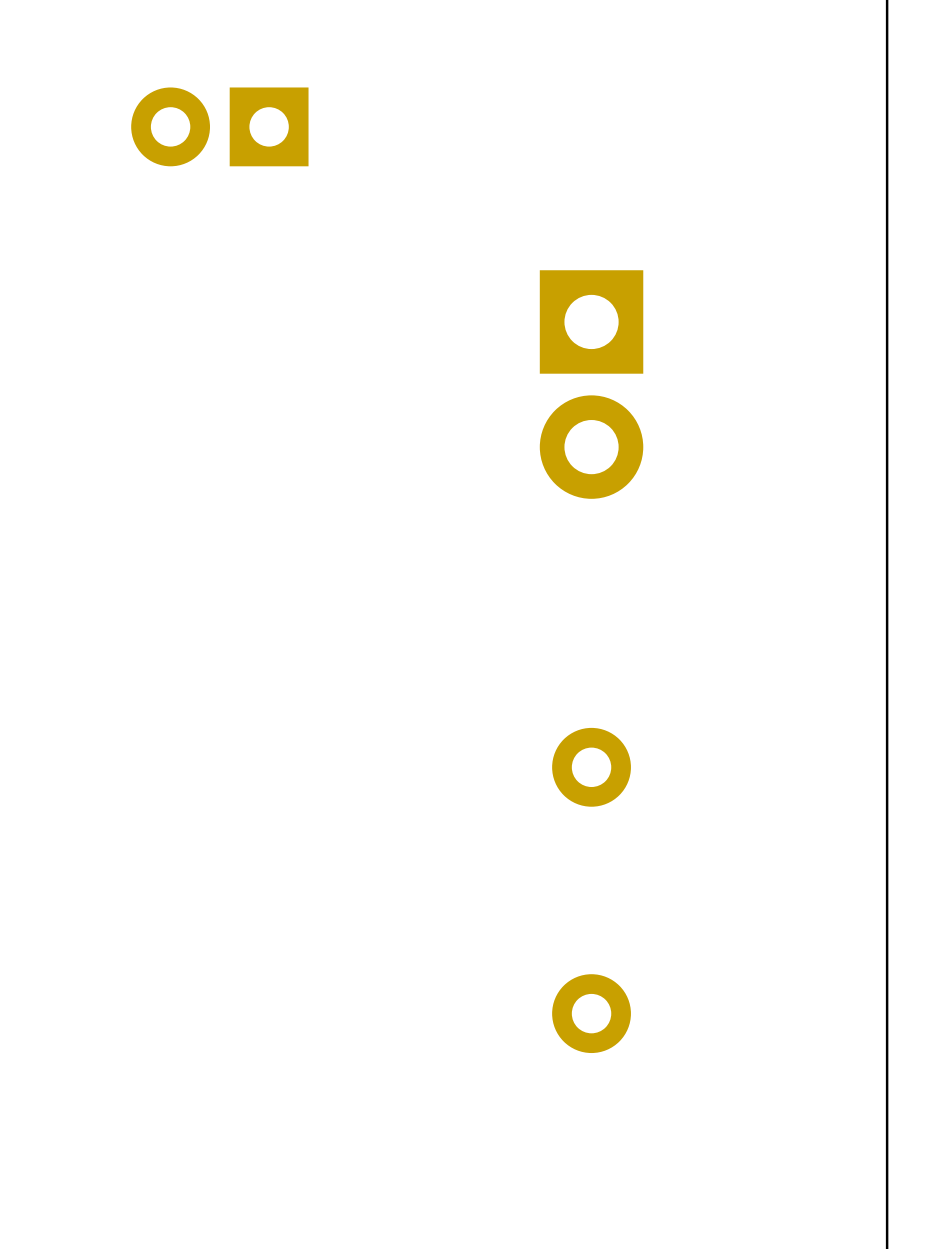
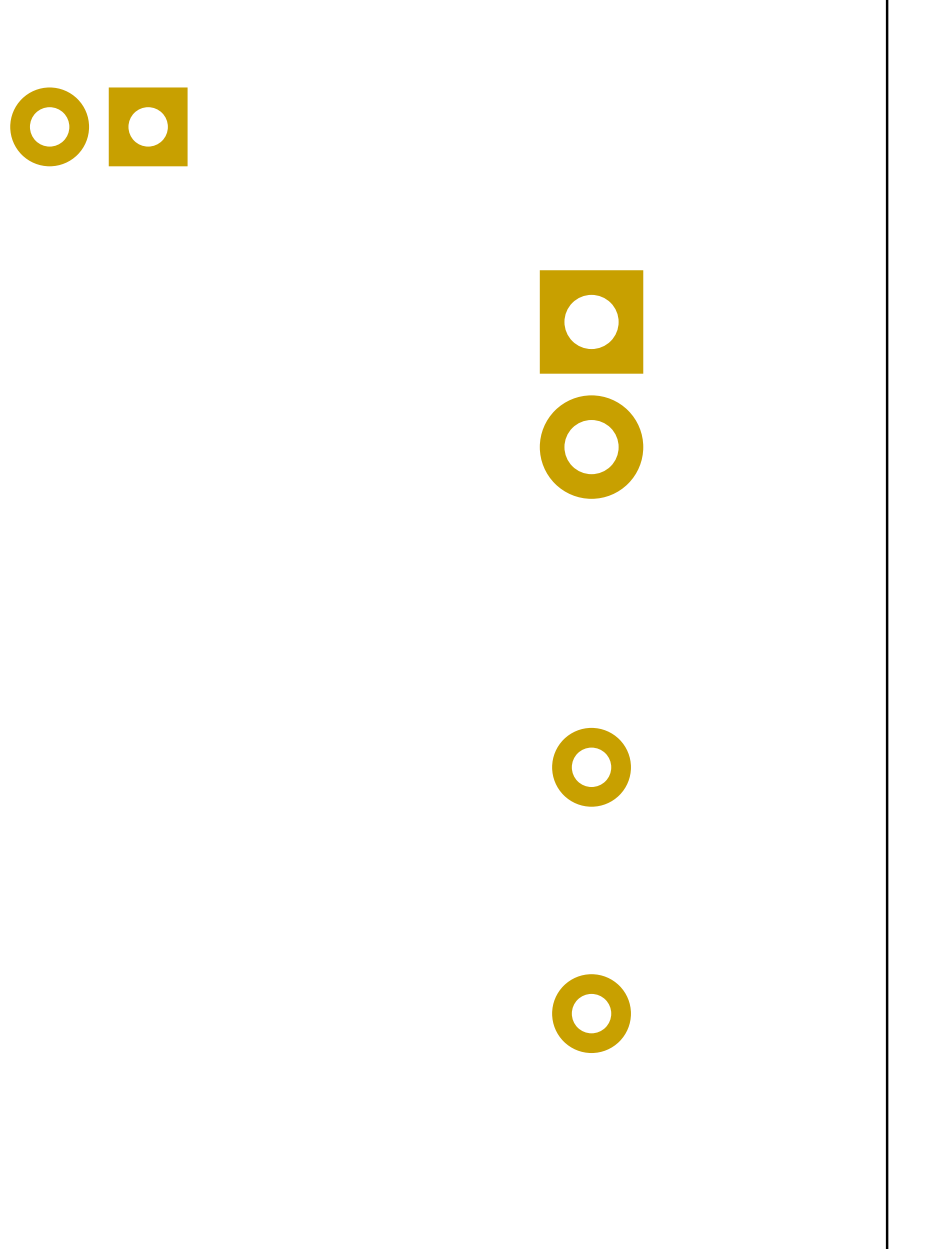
part position: (219, 126) -> (98, 126)

